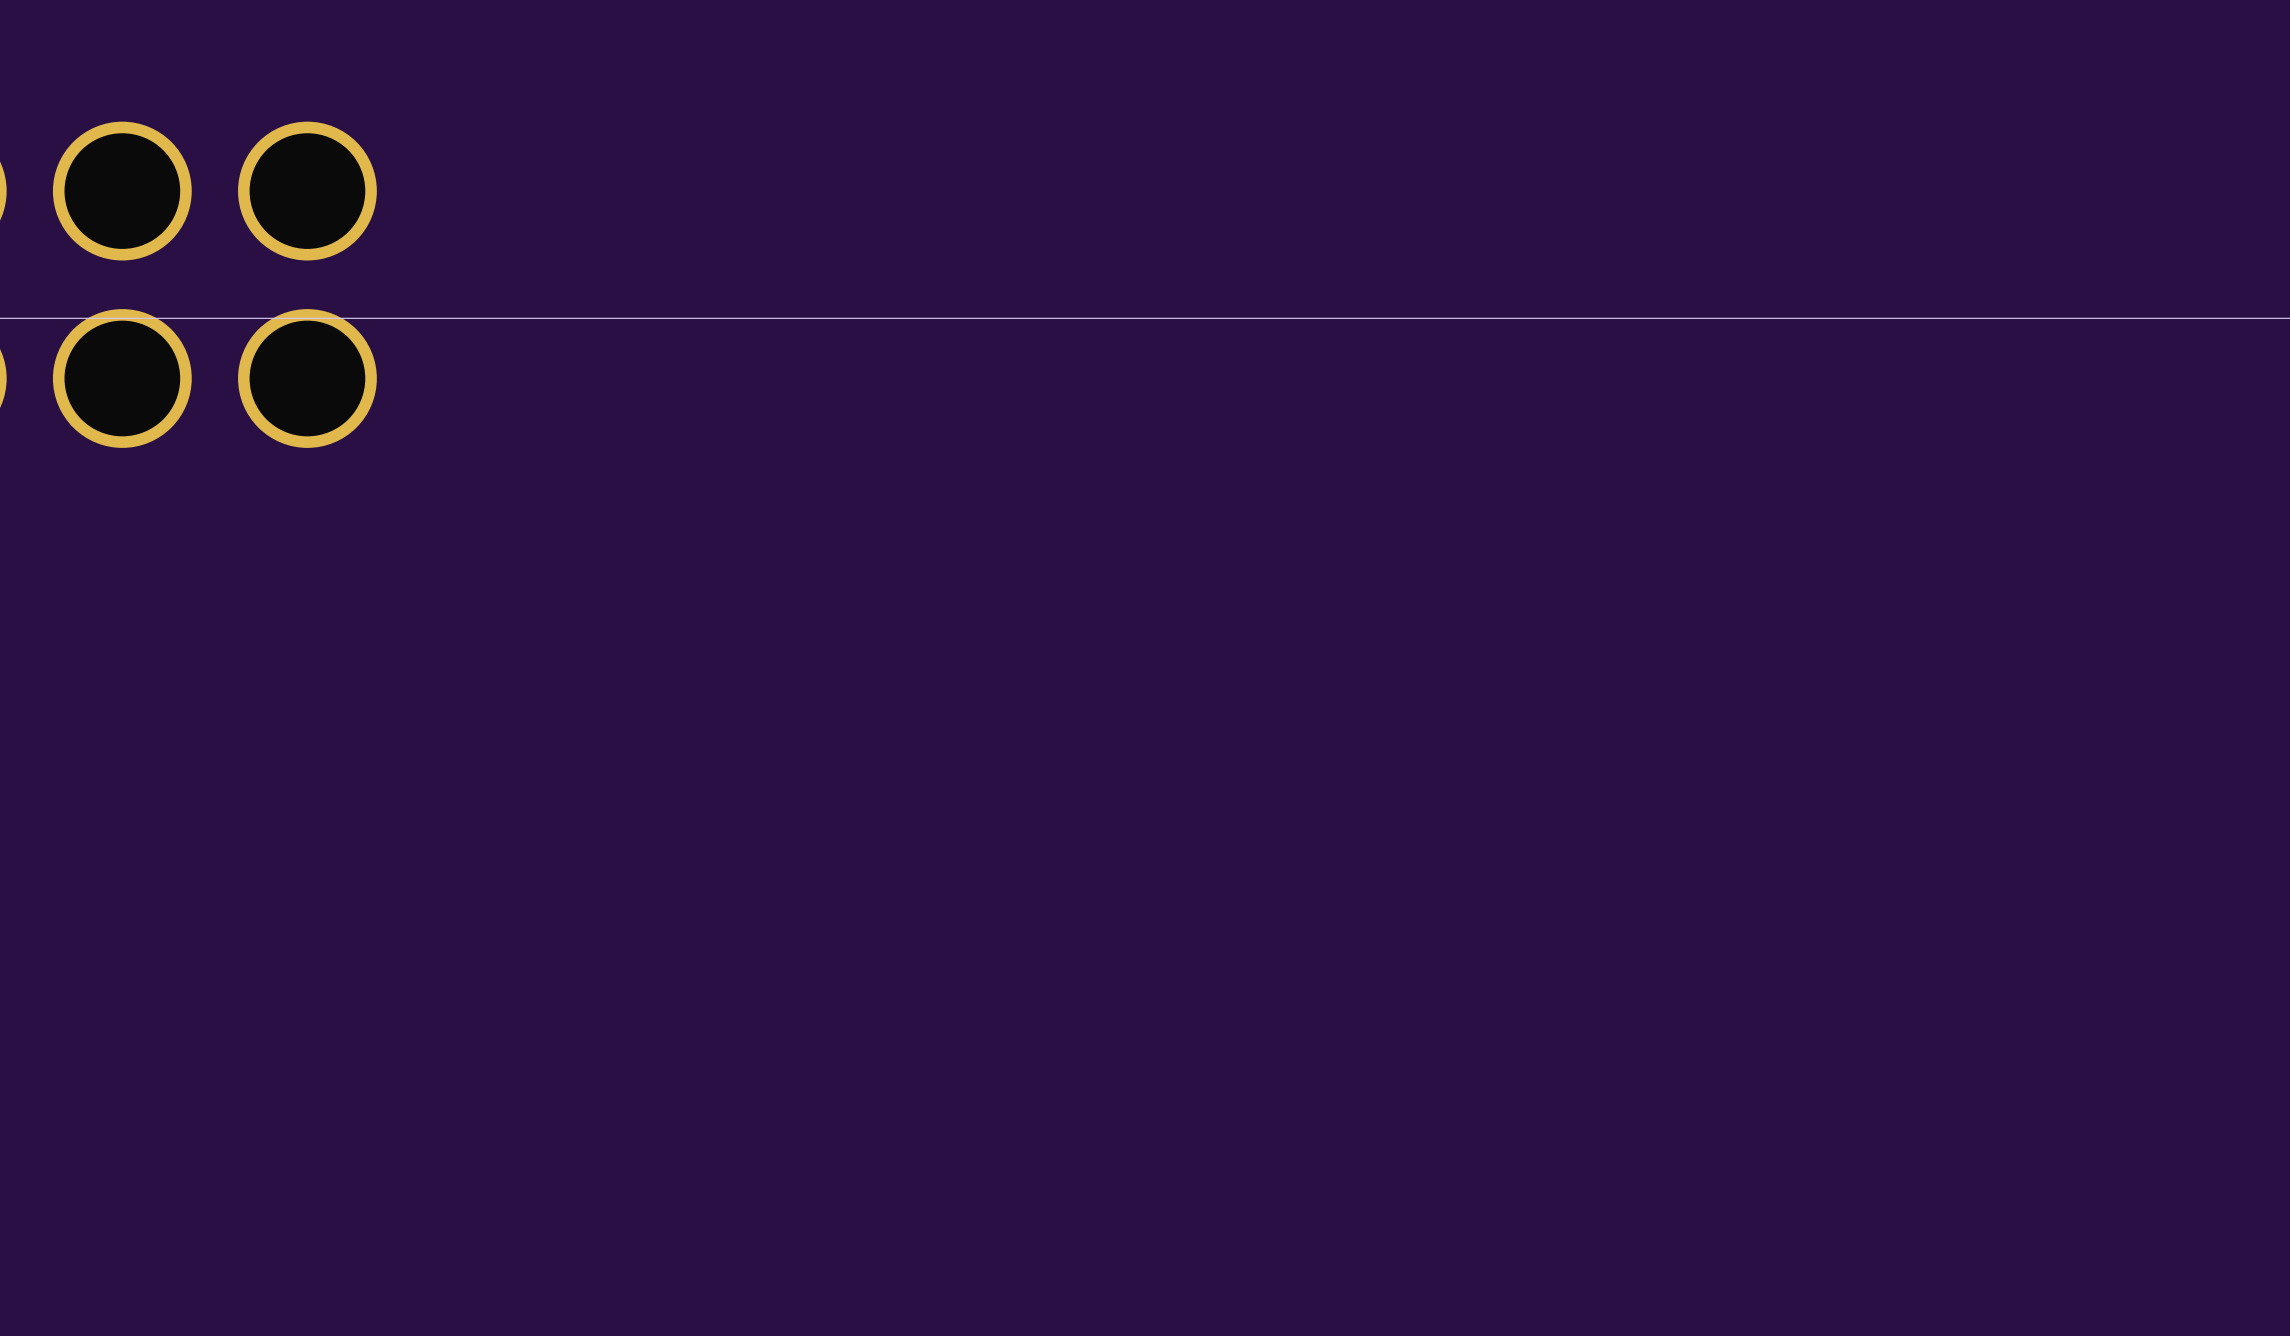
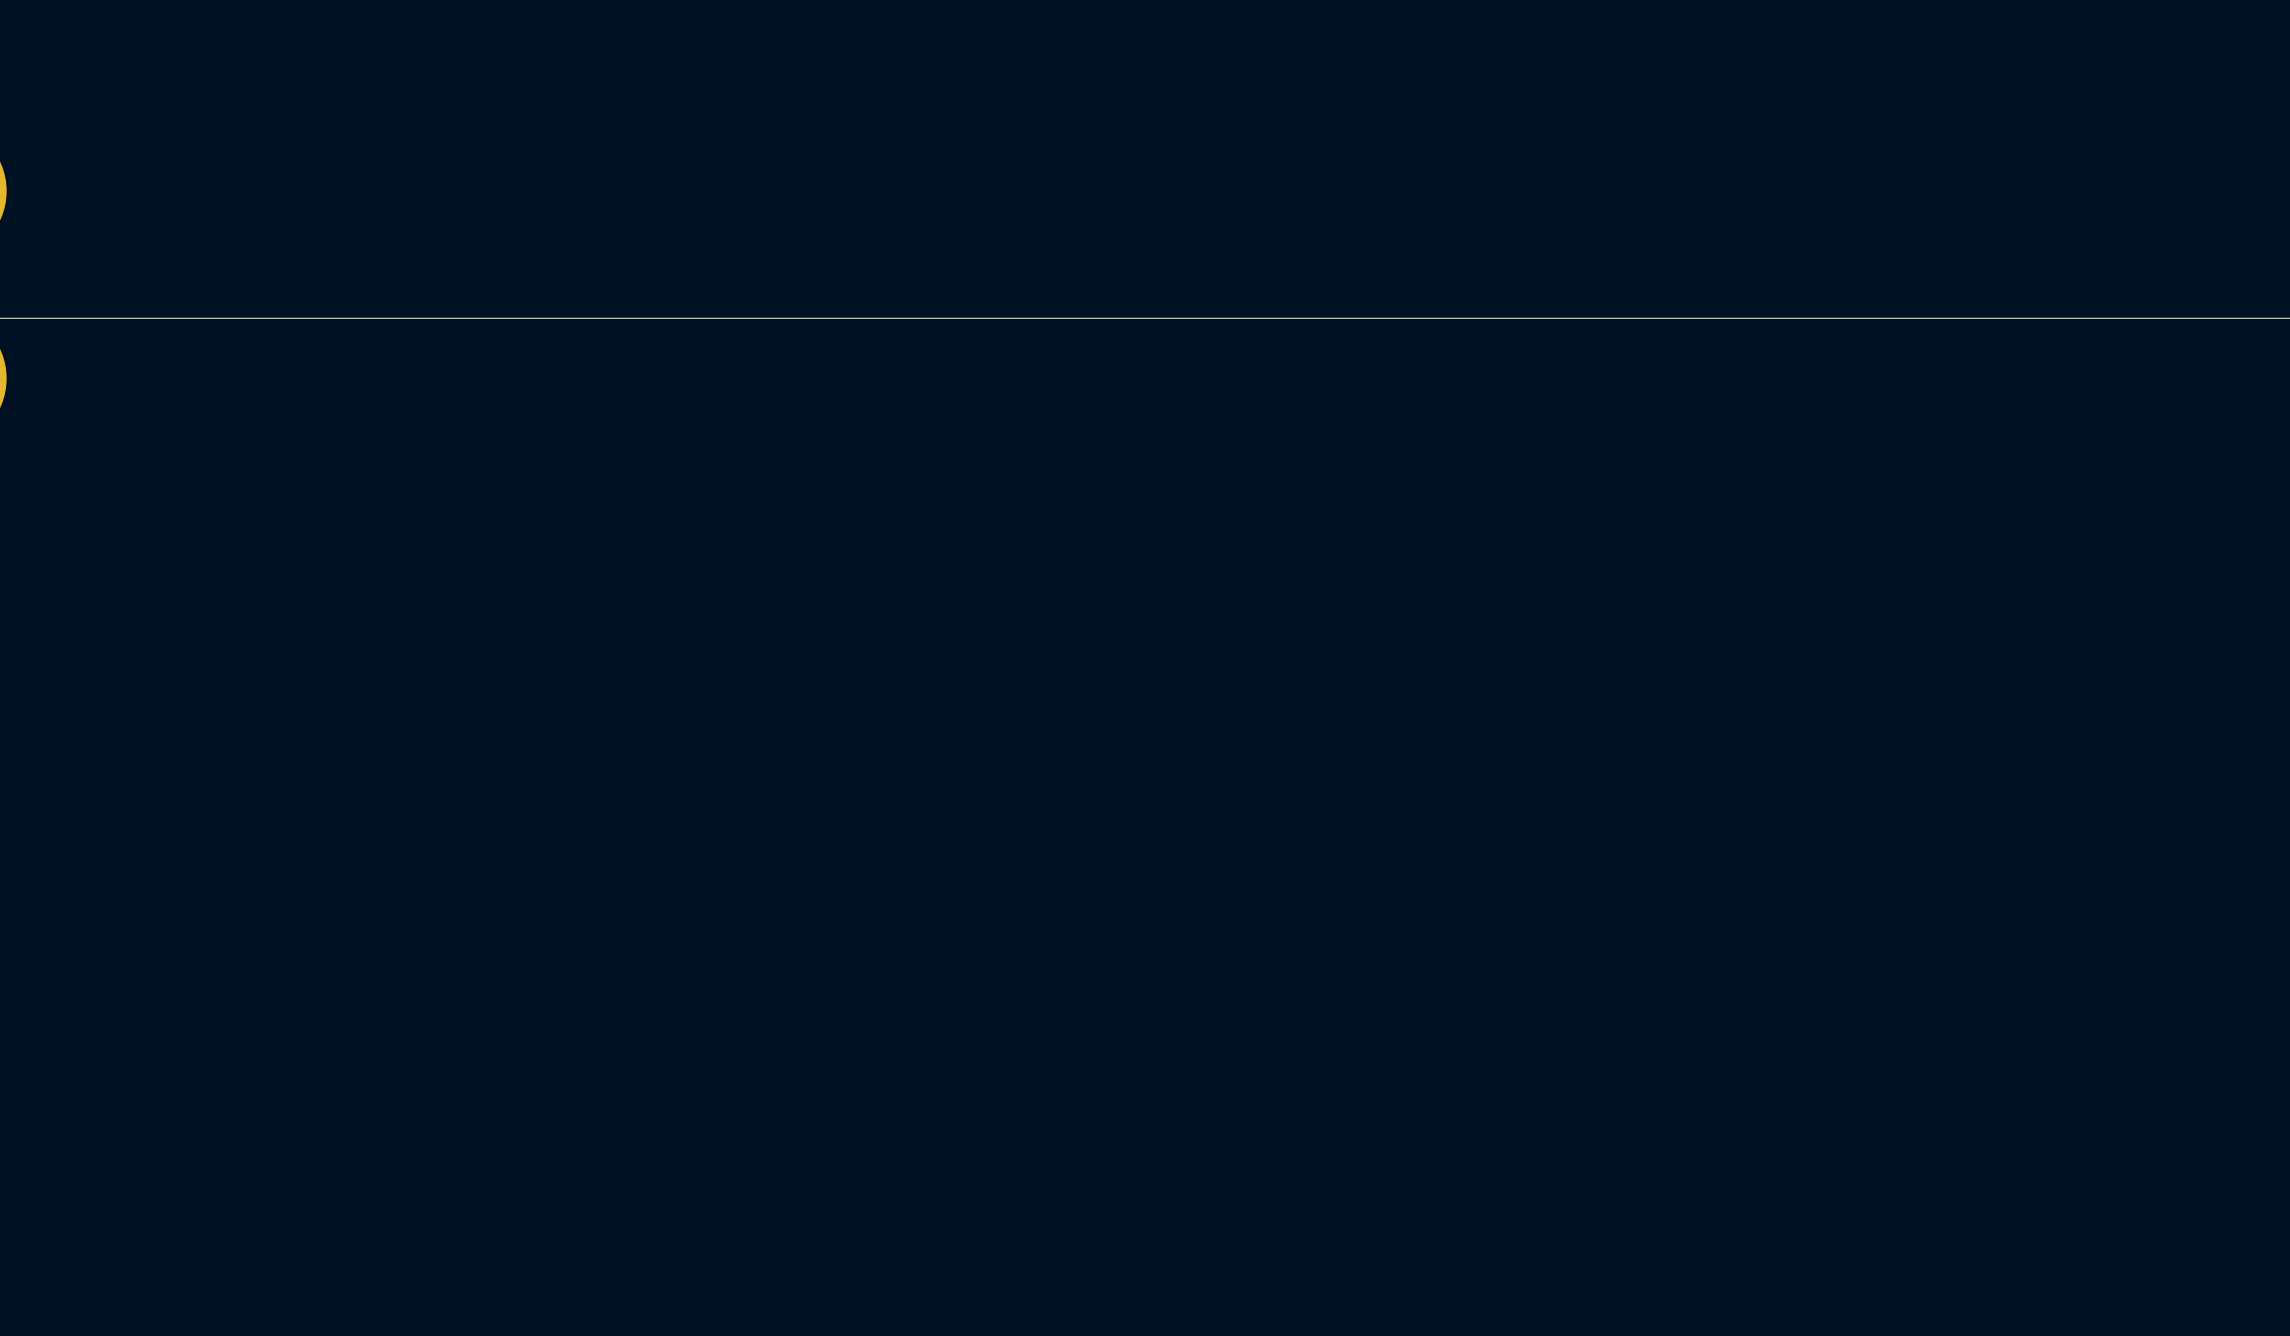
part: (122, 191) -> none
part: (307, 191) -> none
part: (122, 378) -> none
part: (307, 378) -> none

